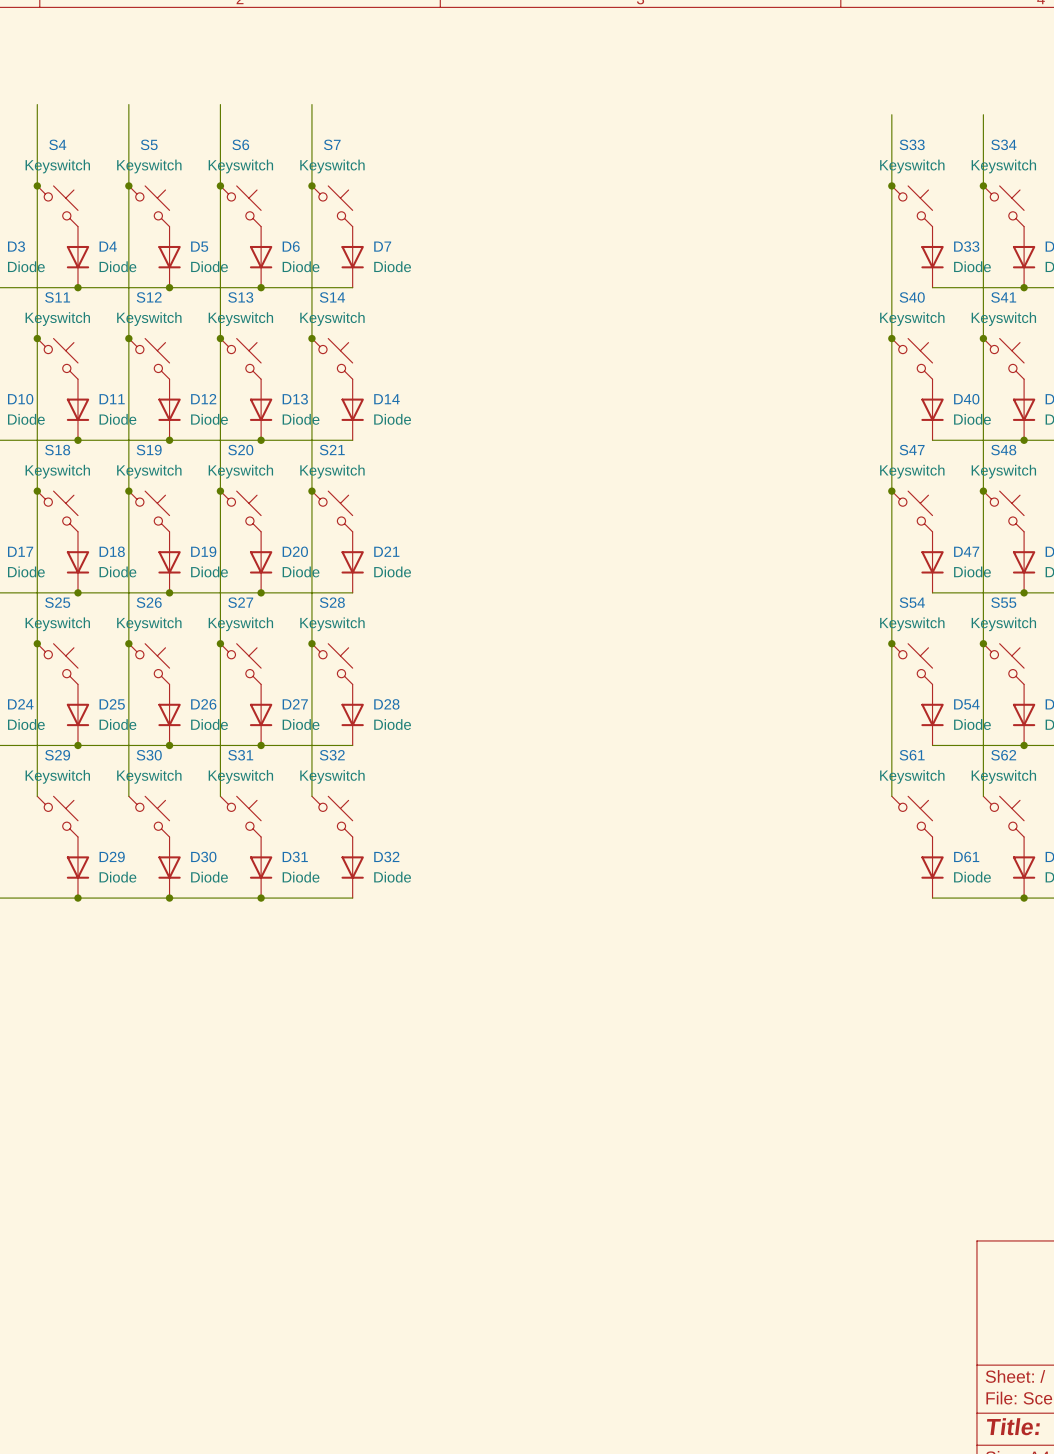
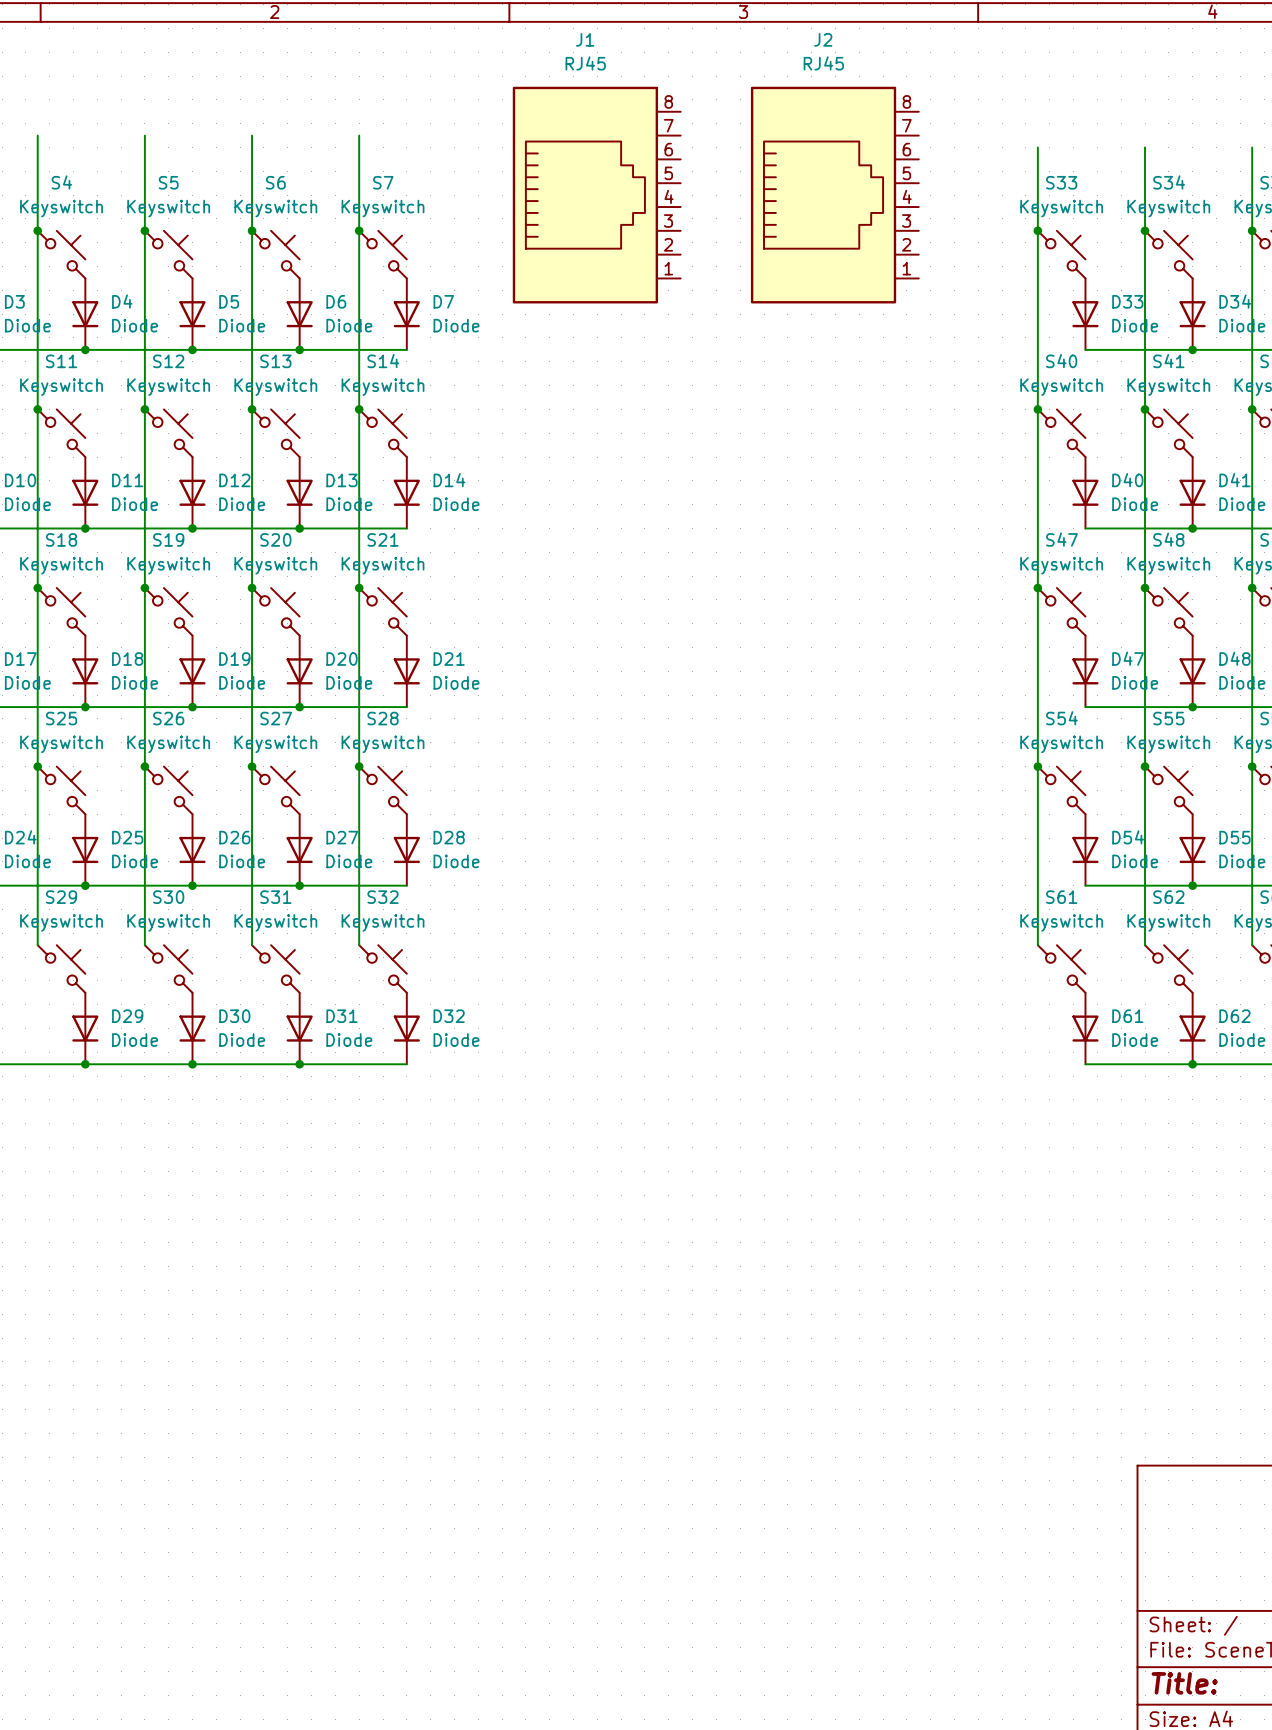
J1: none -> RJ45 (596, 195)
J2: none -> RJ45 (834, 195)

